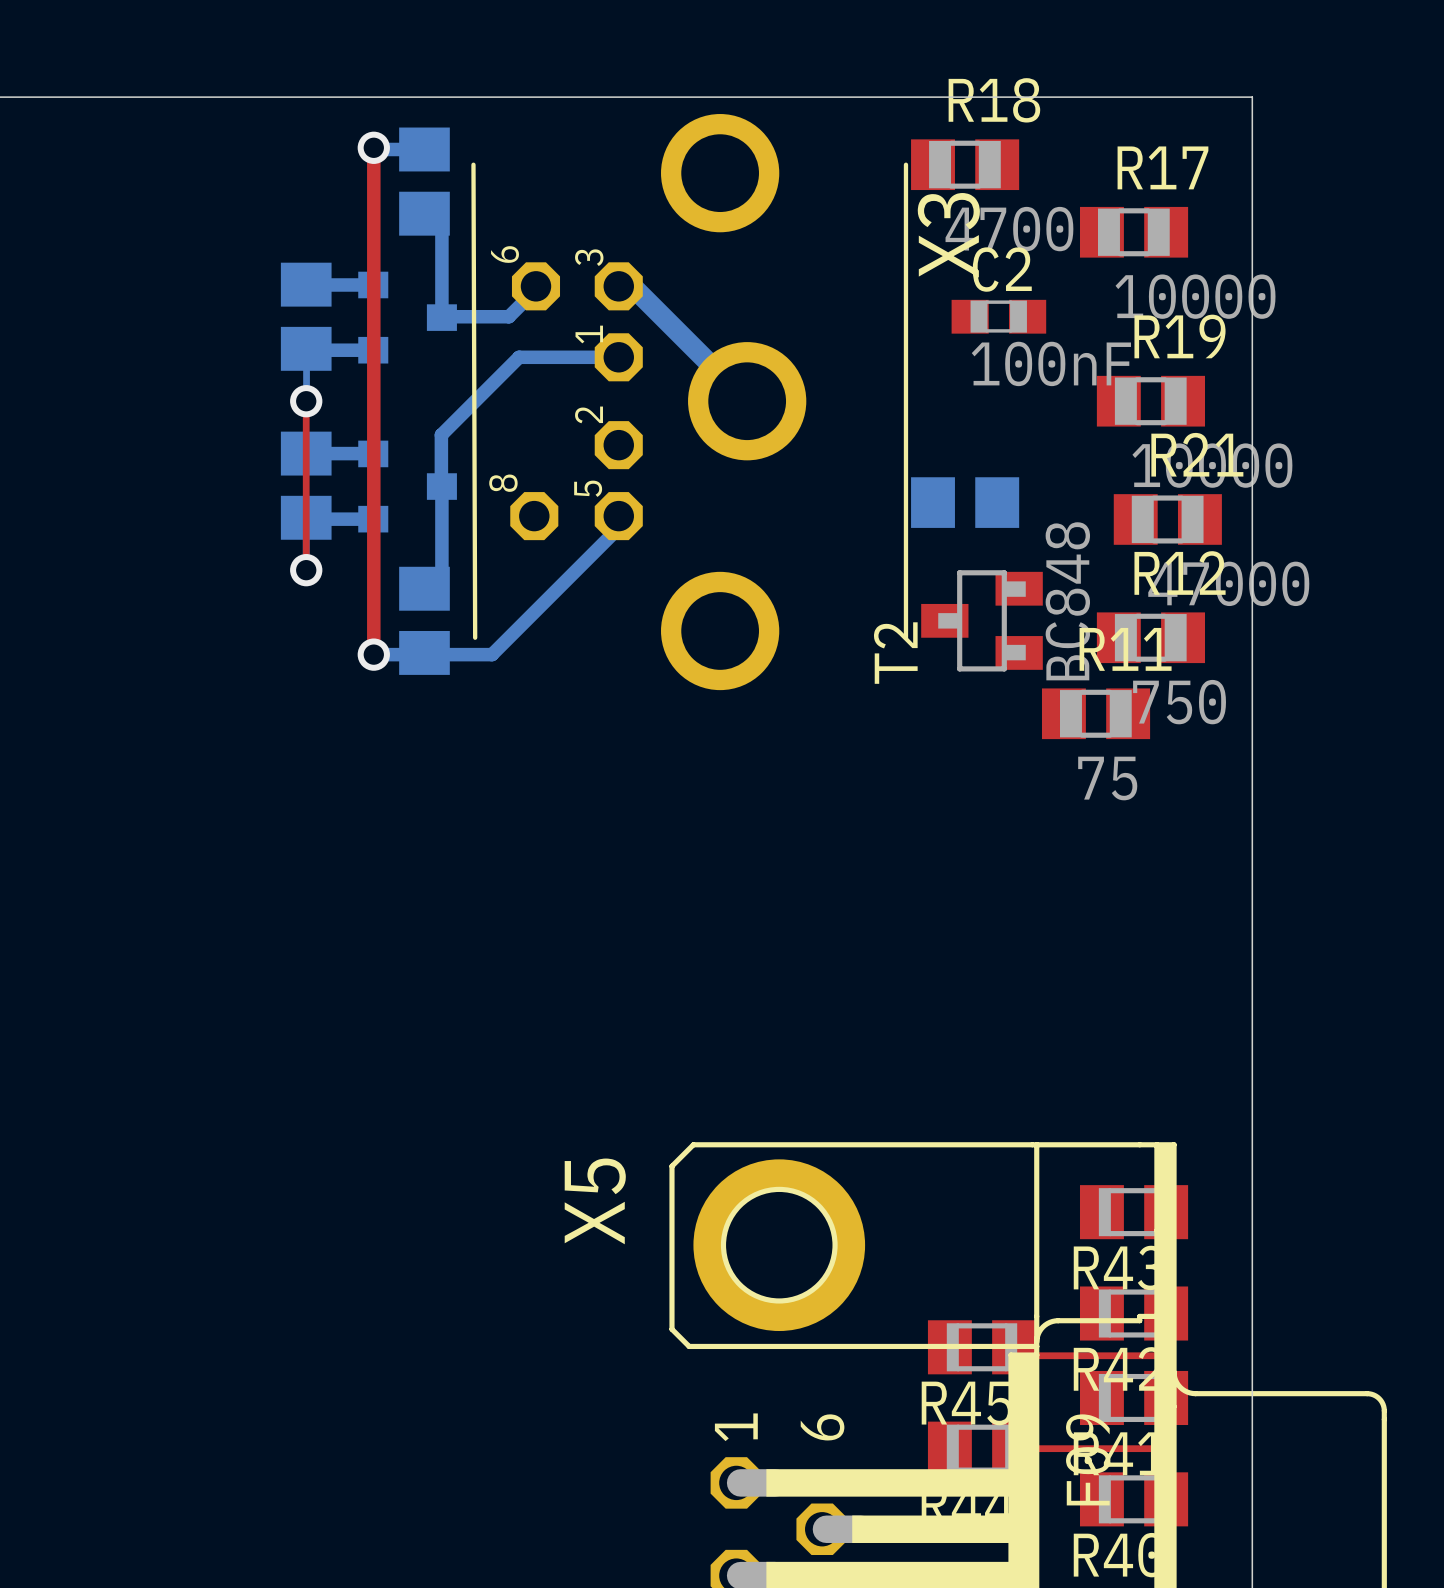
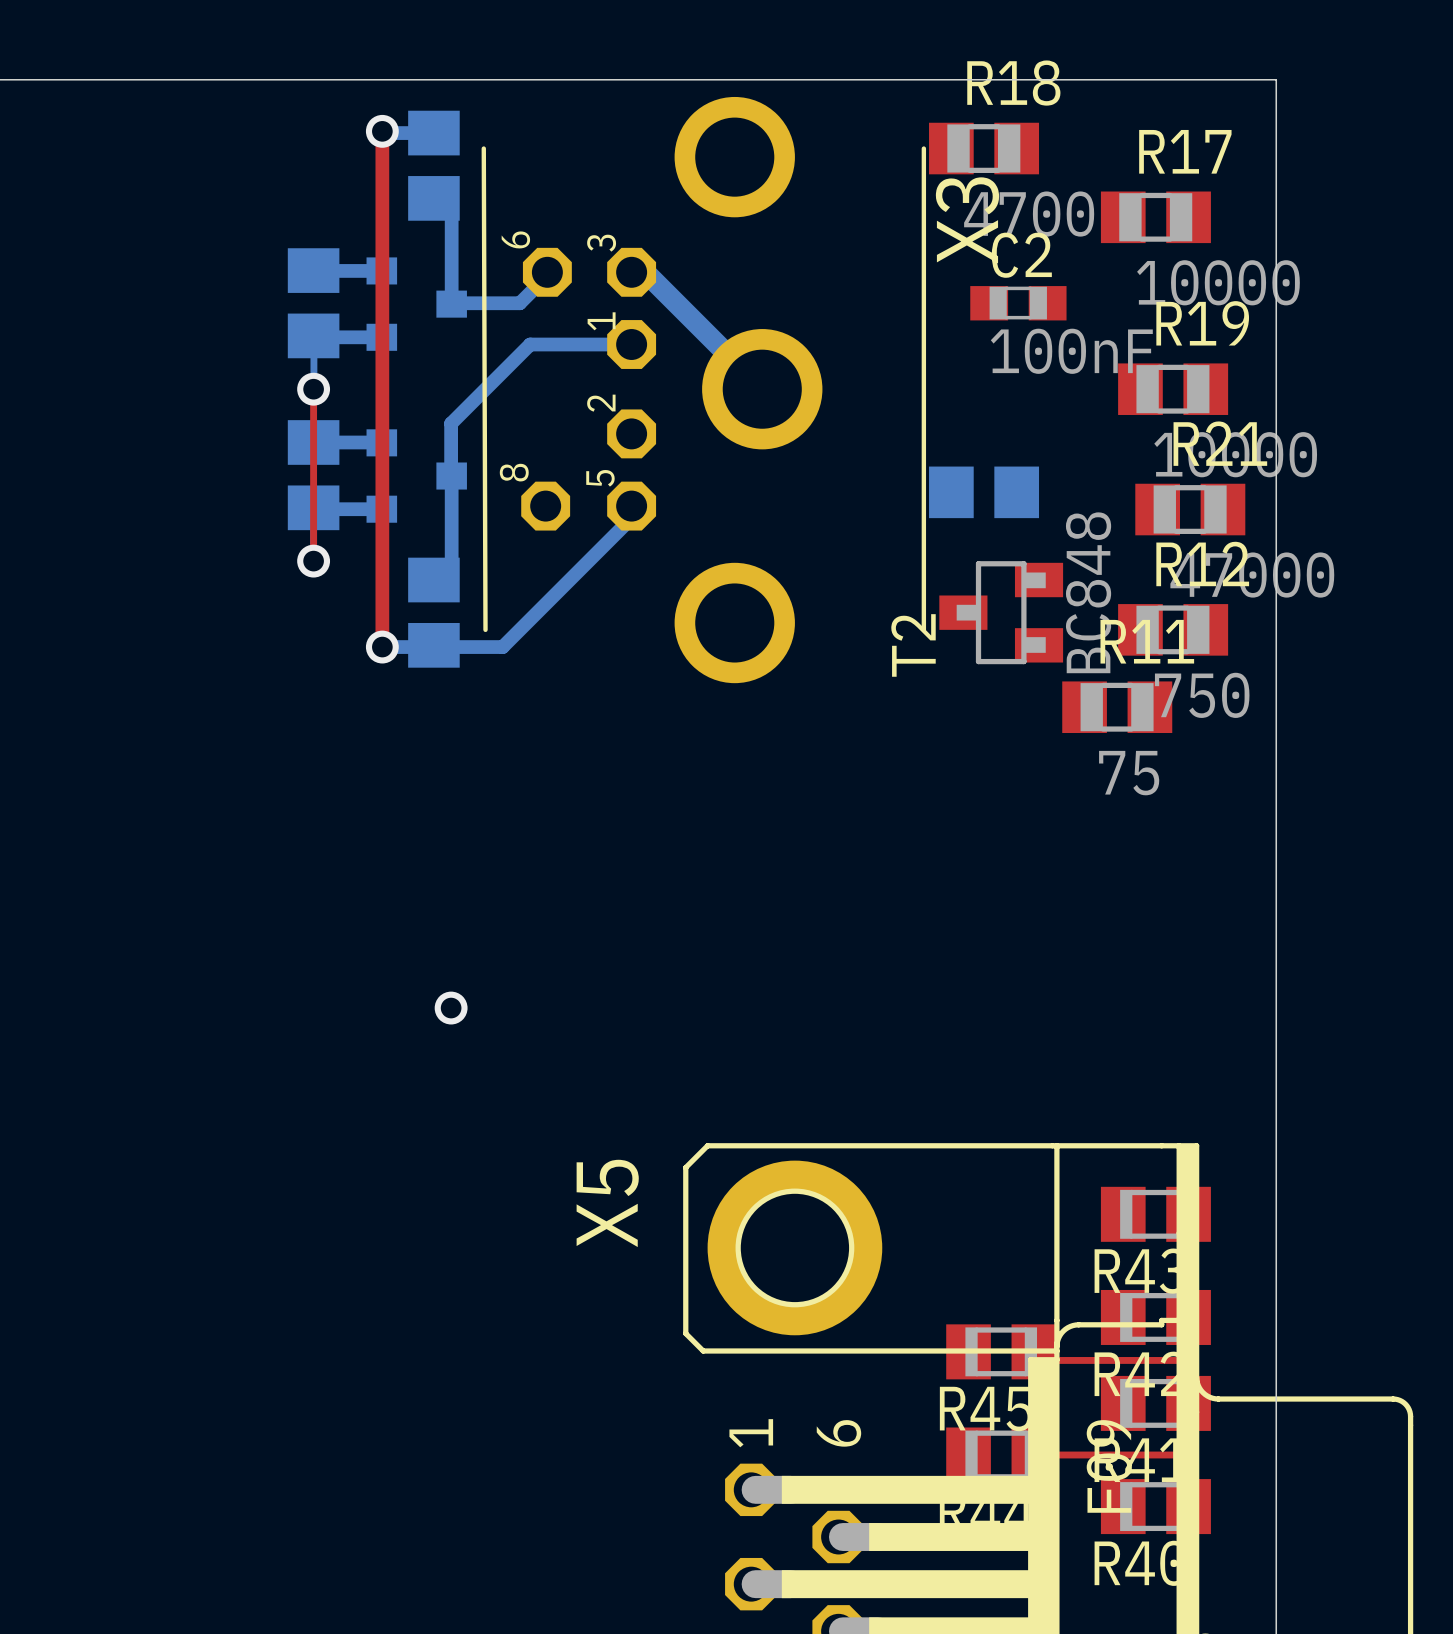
via: none -> (451, 1008)

